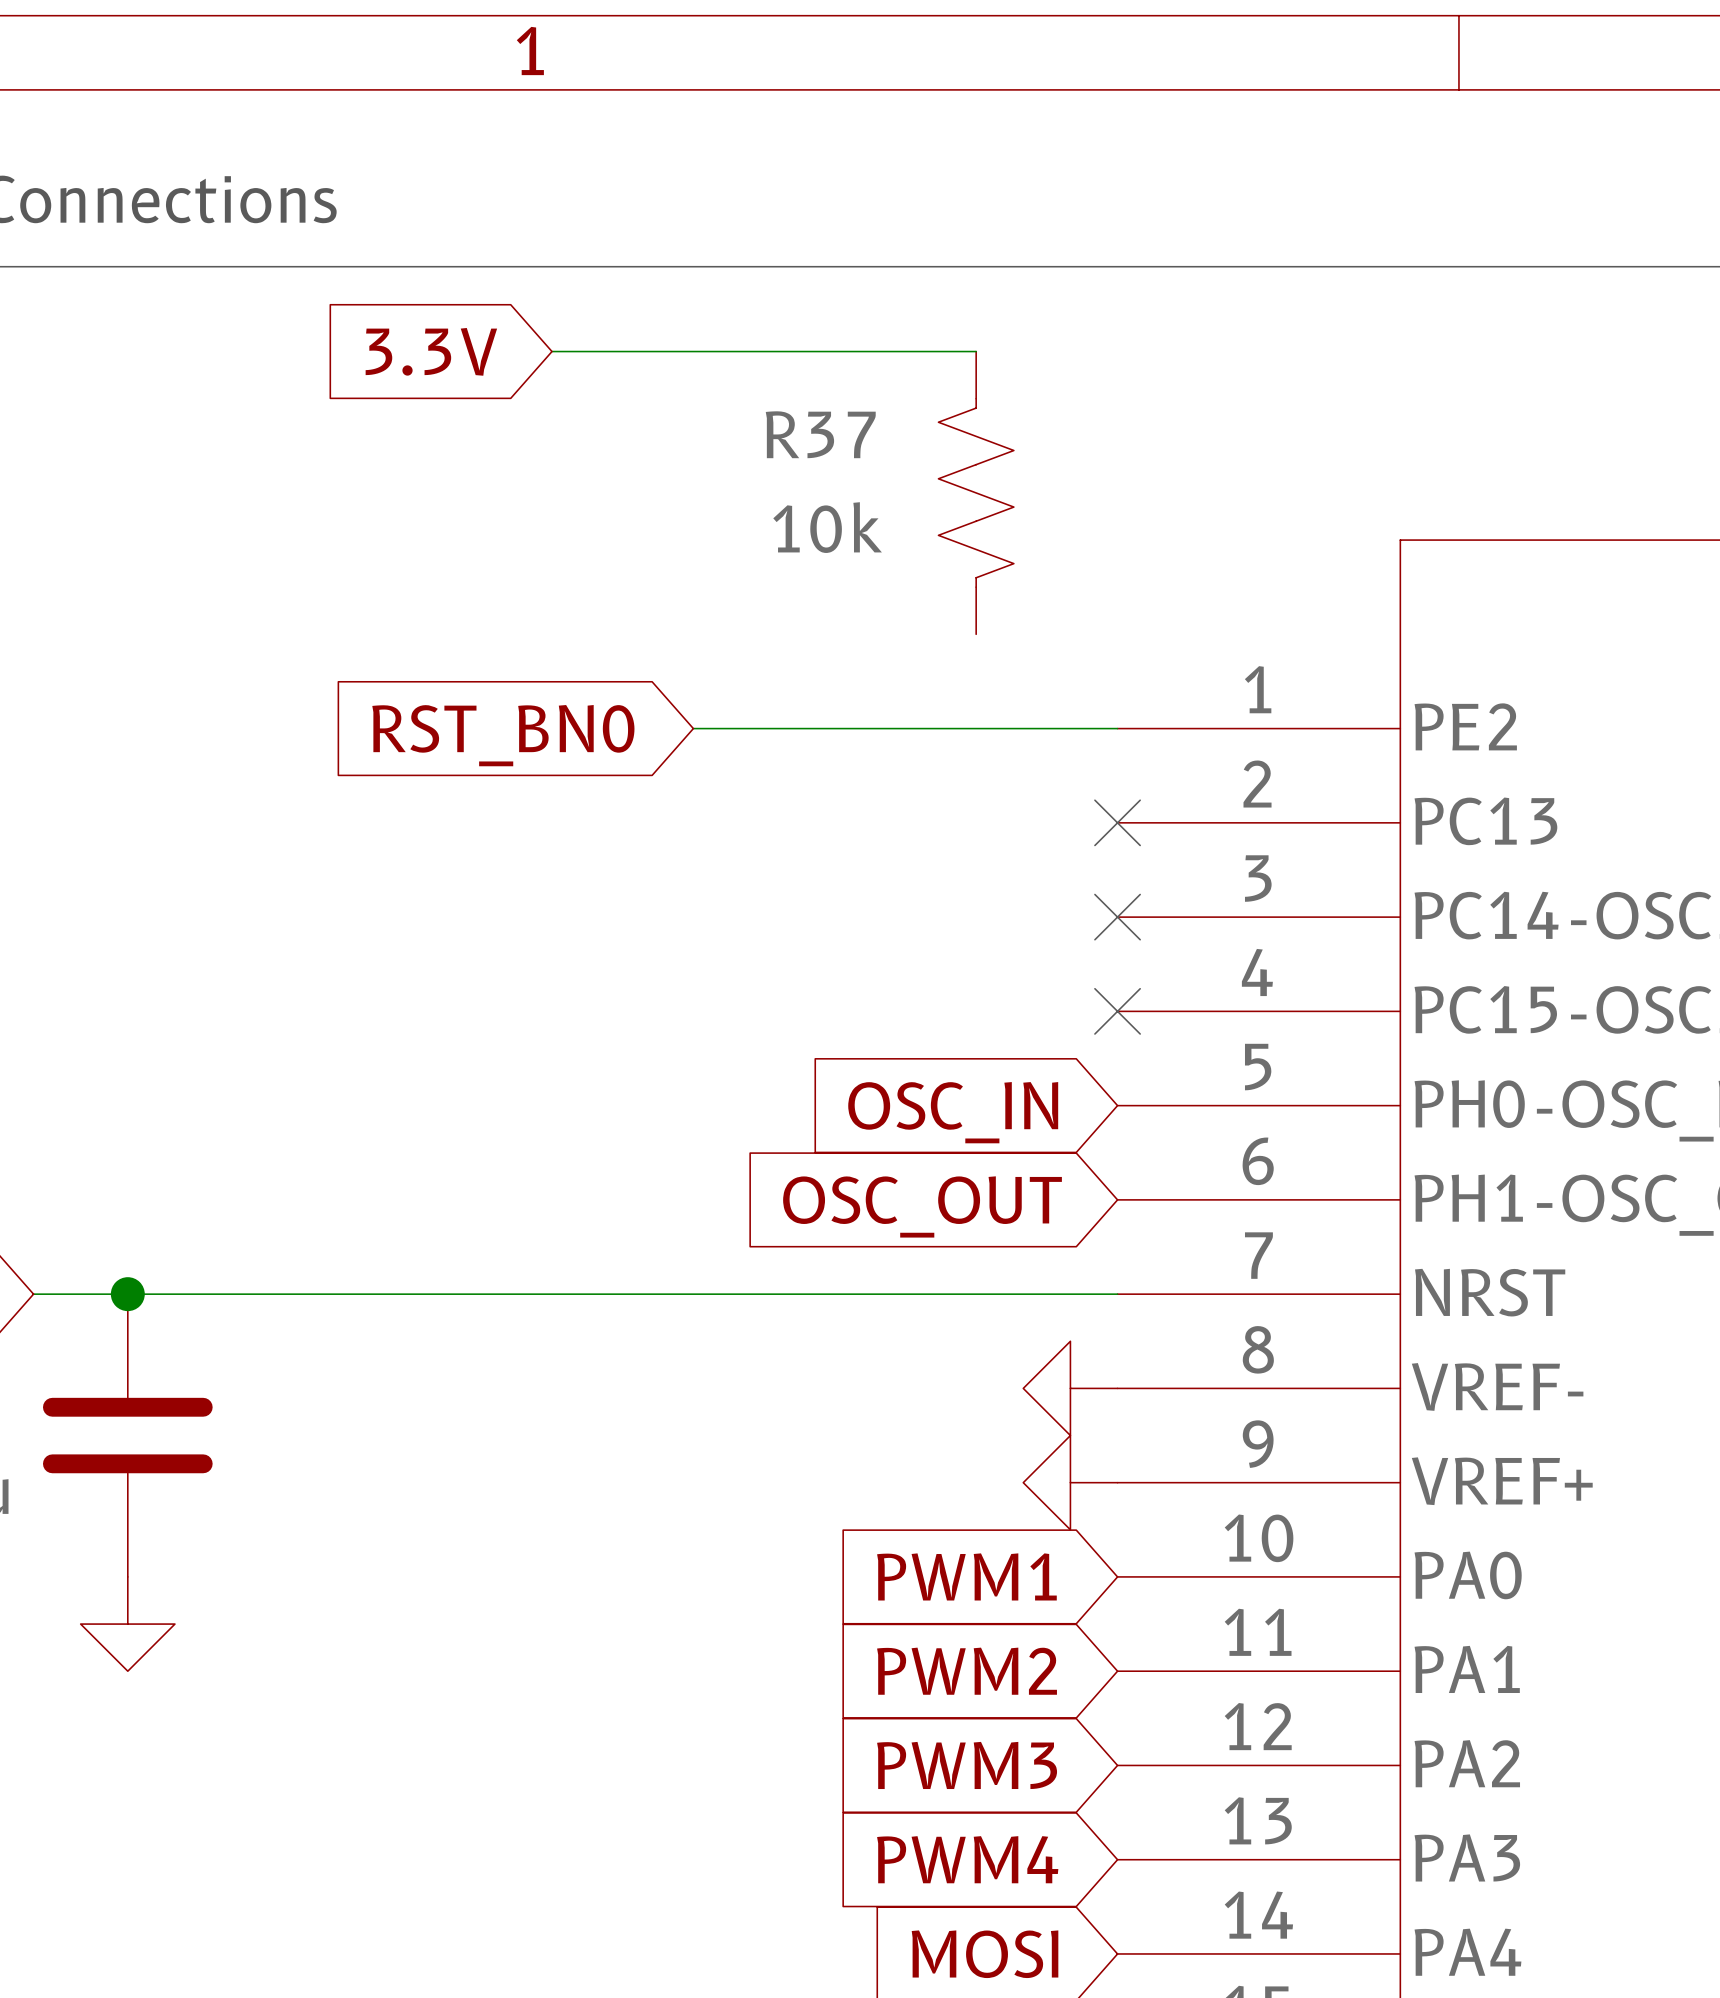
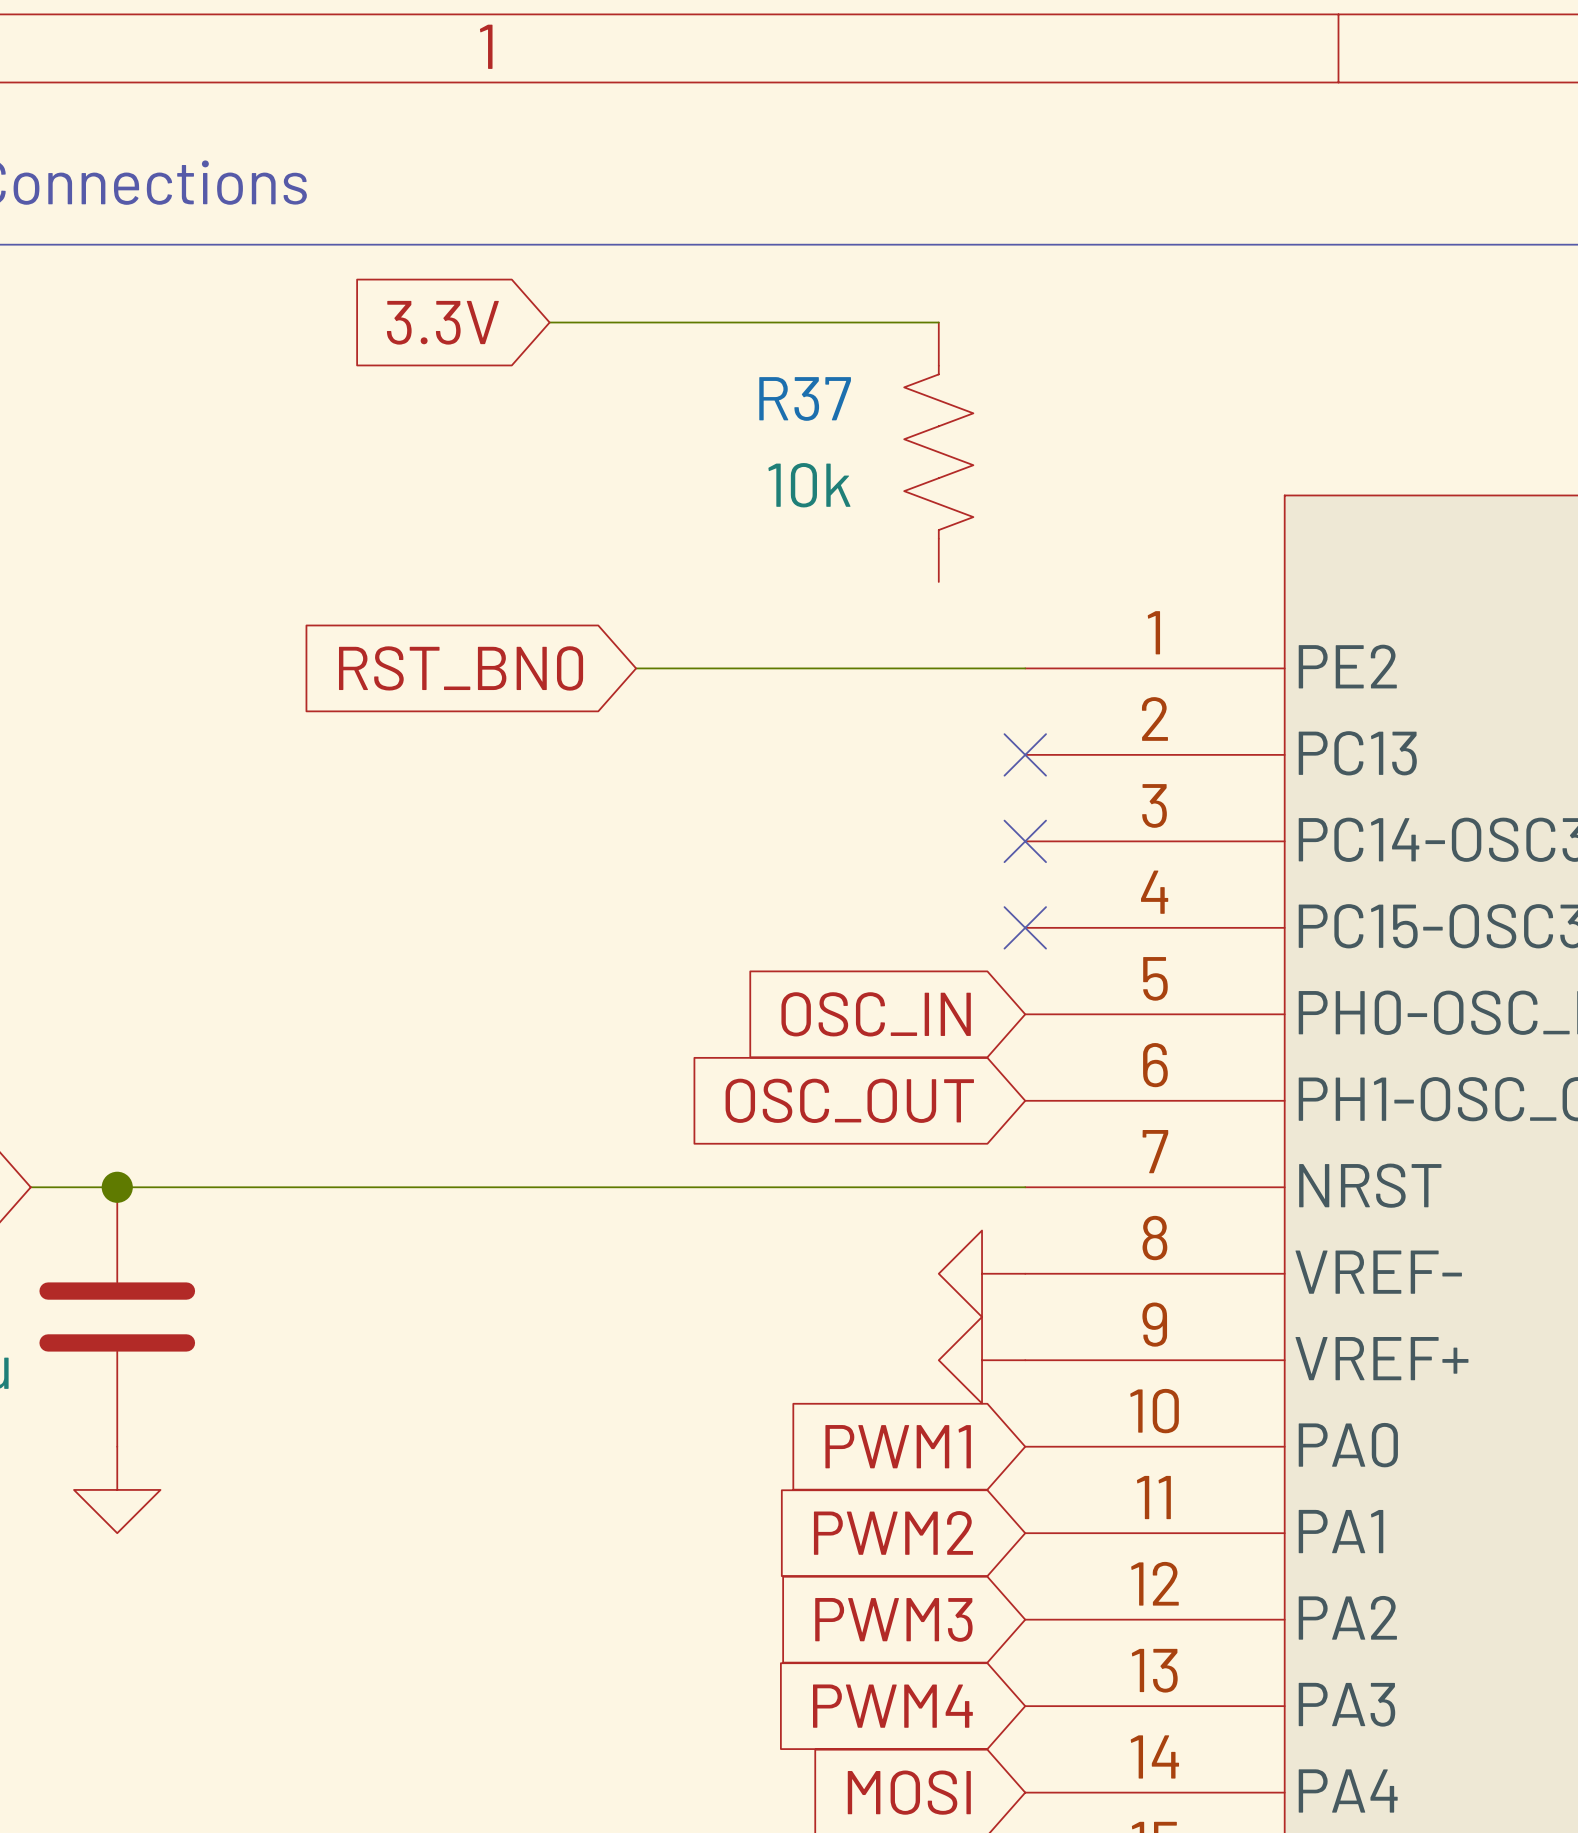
global label position: 3.3V (431, 351) -> 3.3V (442, 322)
wire: (551, 351) (599, 351) -> (895, 322) (938, 322)
R37 position: (976, 492) -> (938, 452)

